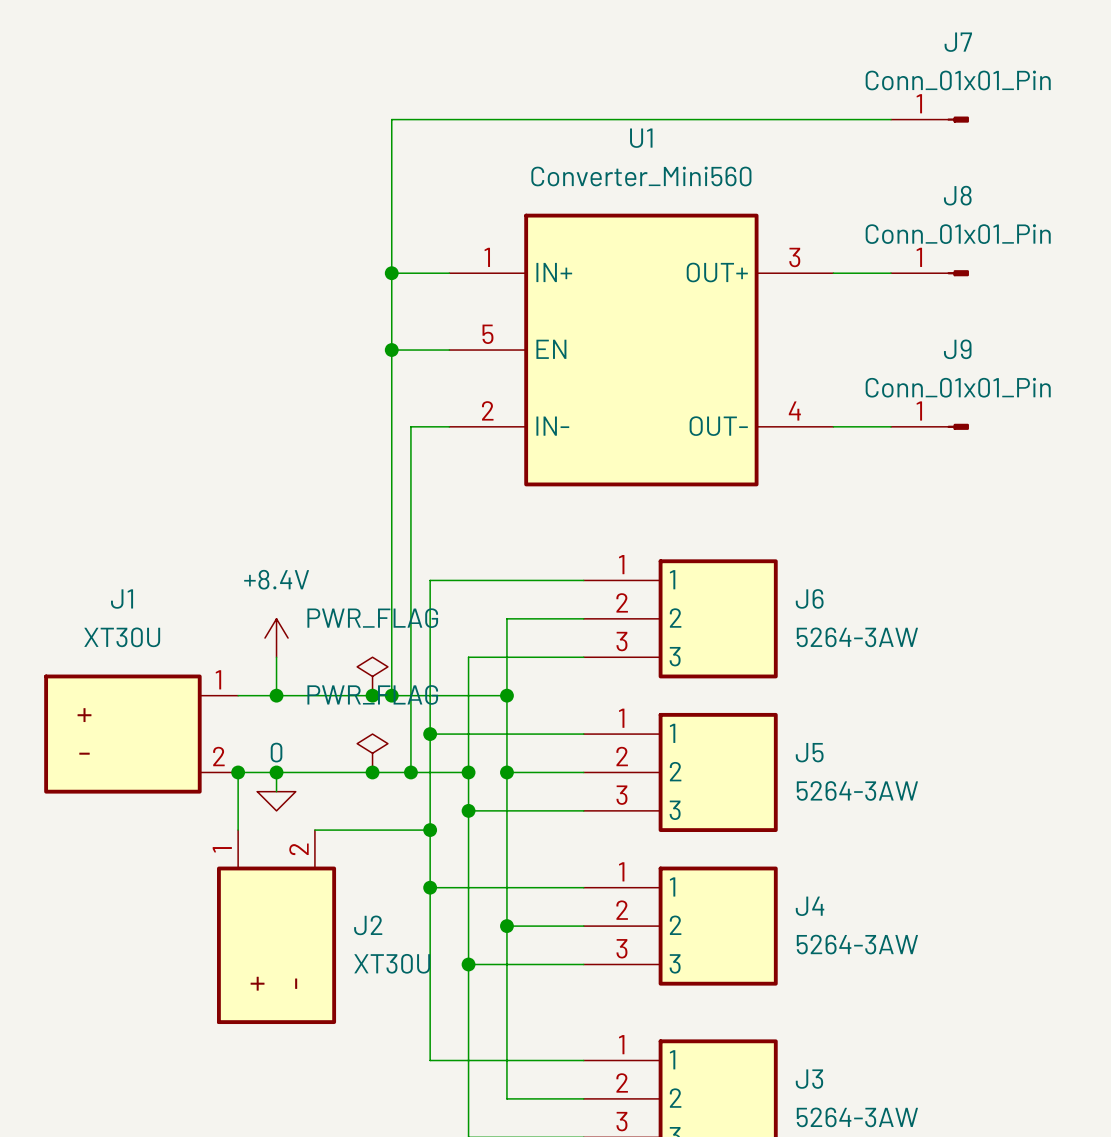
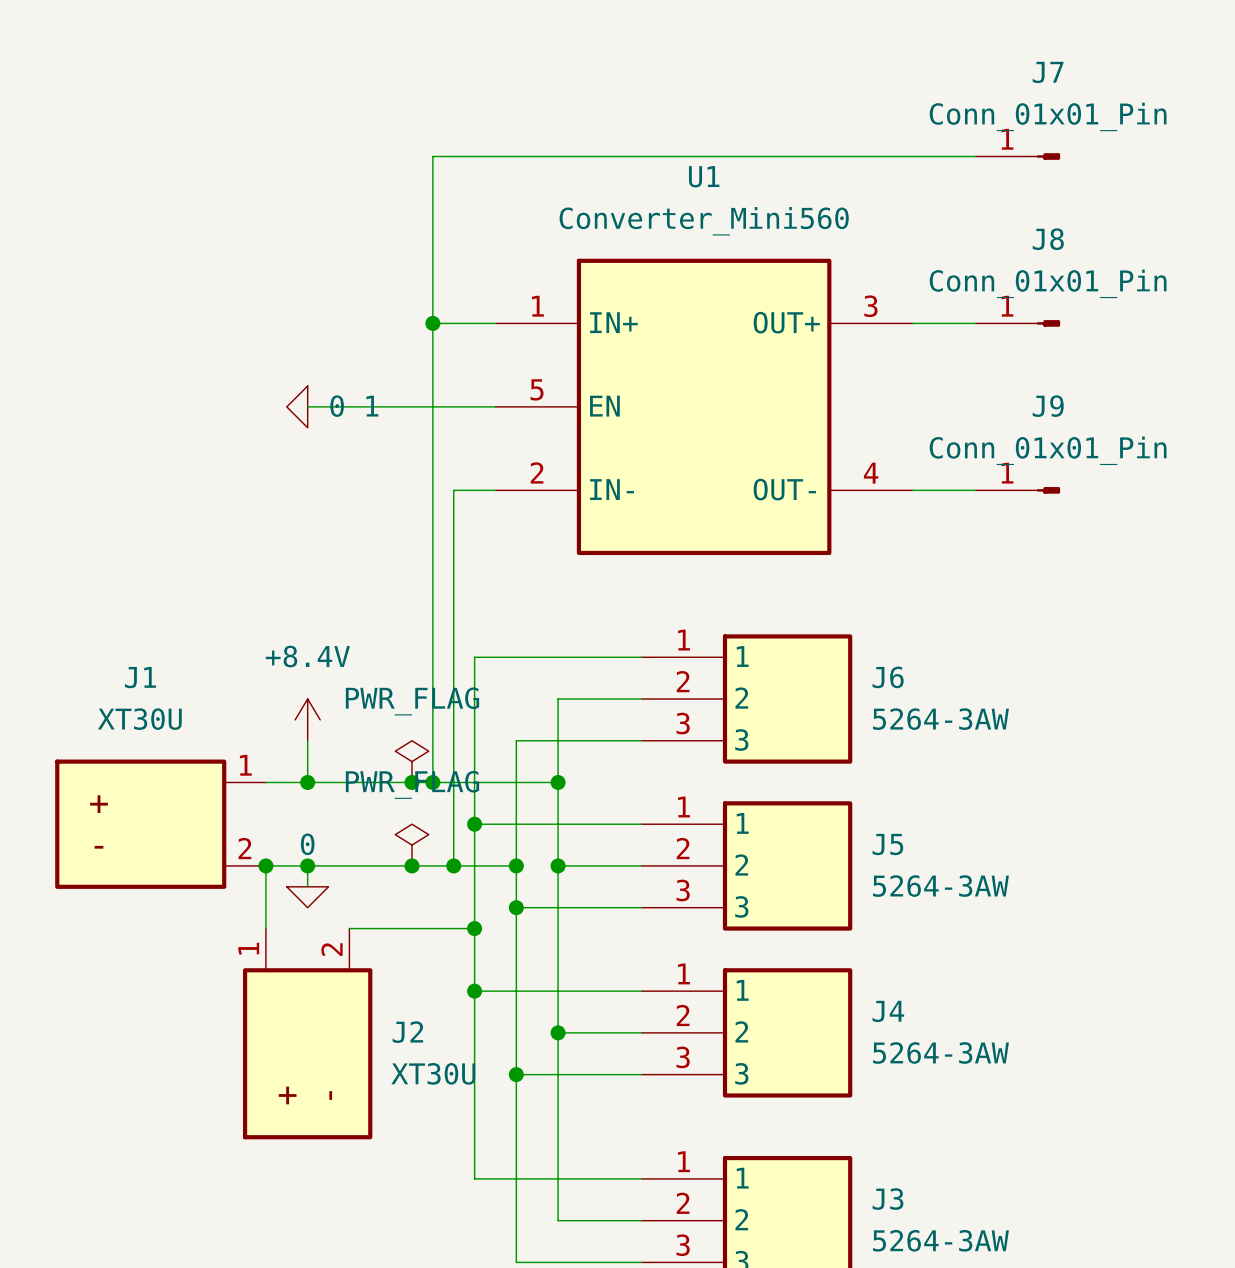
power symbol: none -> 0 1 (297, 406)
wire: none -> (307, 406) (432, 406)
junction: (391, 350) -> none

